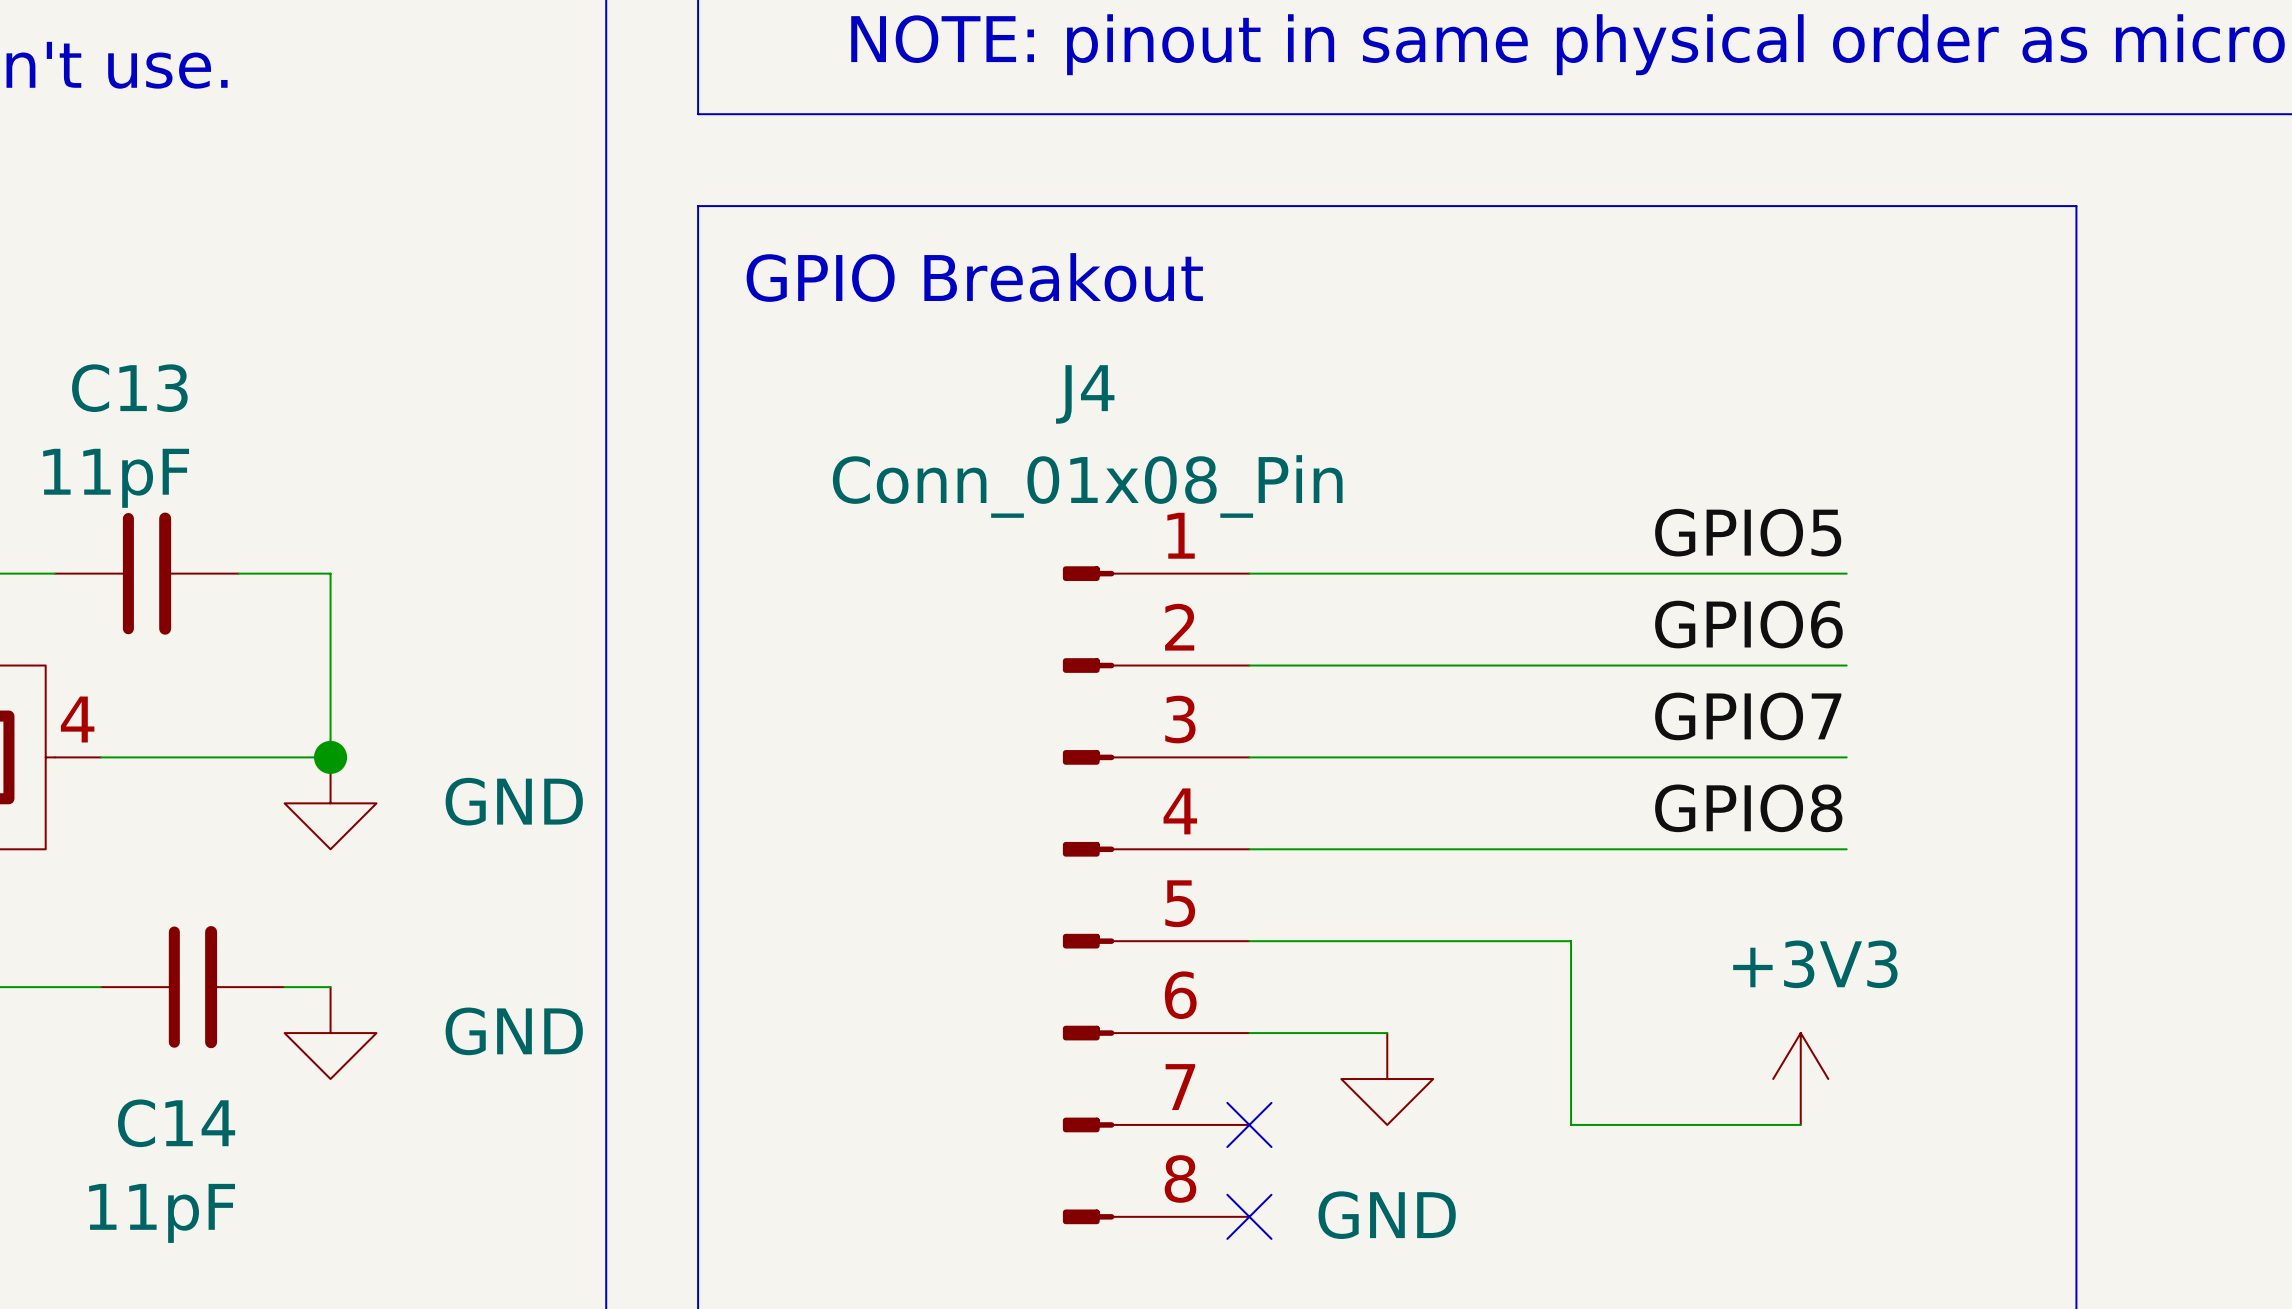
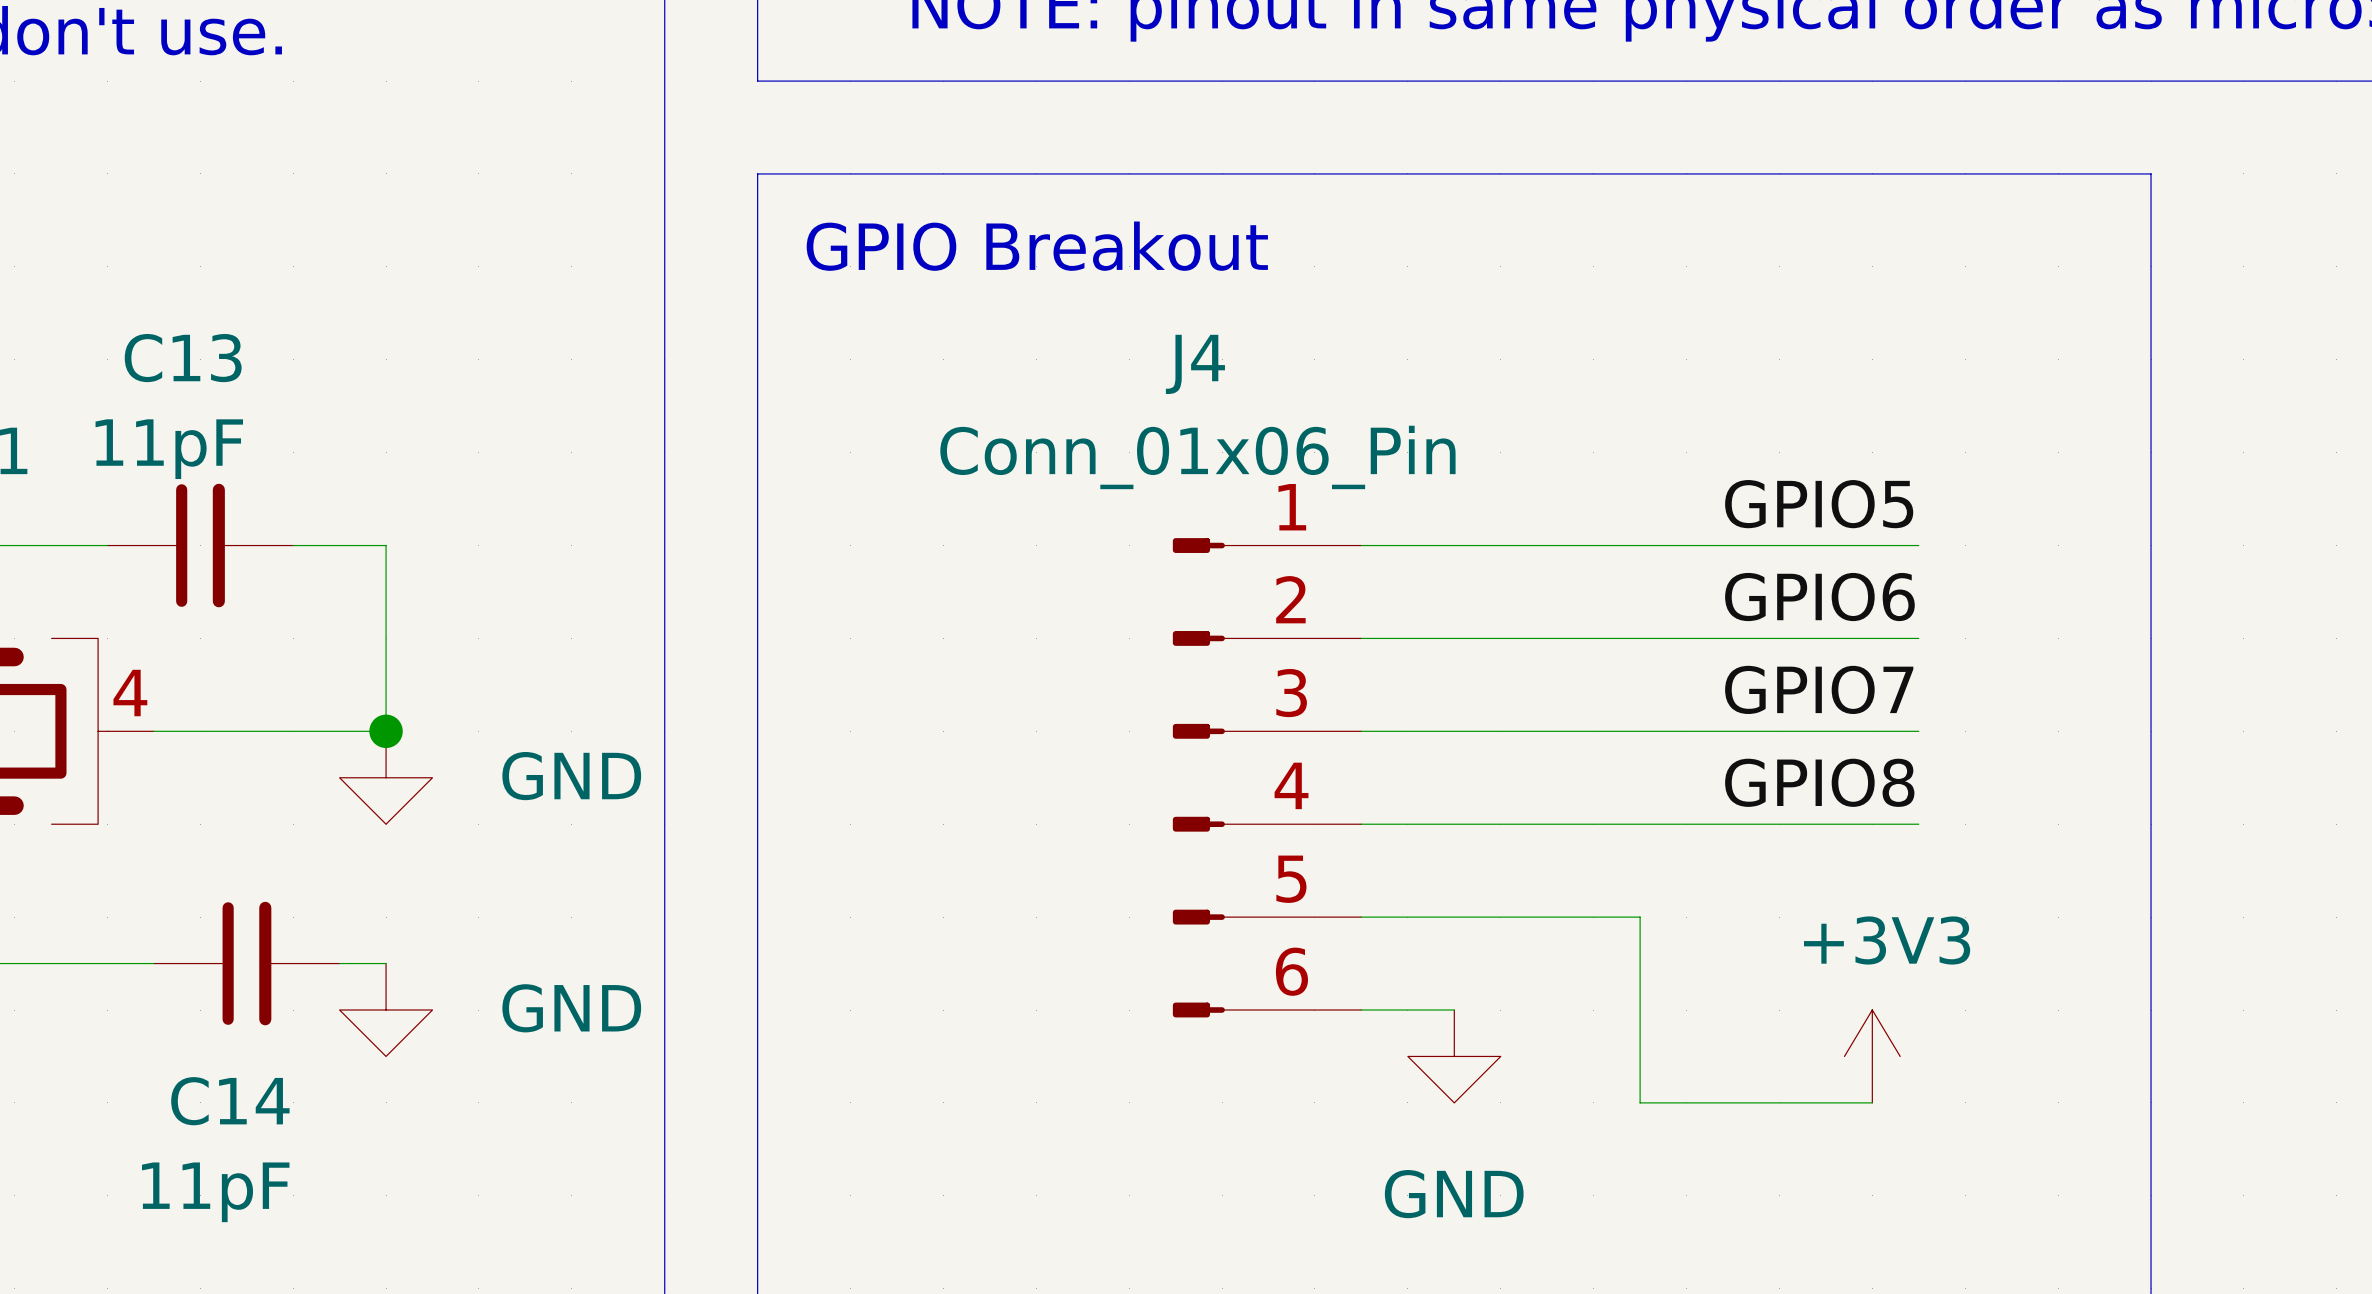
J4 name position: J4 (1085, 394) -> J4 (1195, 364)
J4 value: Conn_01x08_Pin (1087, 486) -> Conn_01x06_Pin (1197, 457)
J4 symbol: [1062, 566, 1250, 1225] -> [1172, 538, 1362, 1018]
no-connect mark: (1249, 1124) -> none
no-connect mark: (1249, 1216) -> none

